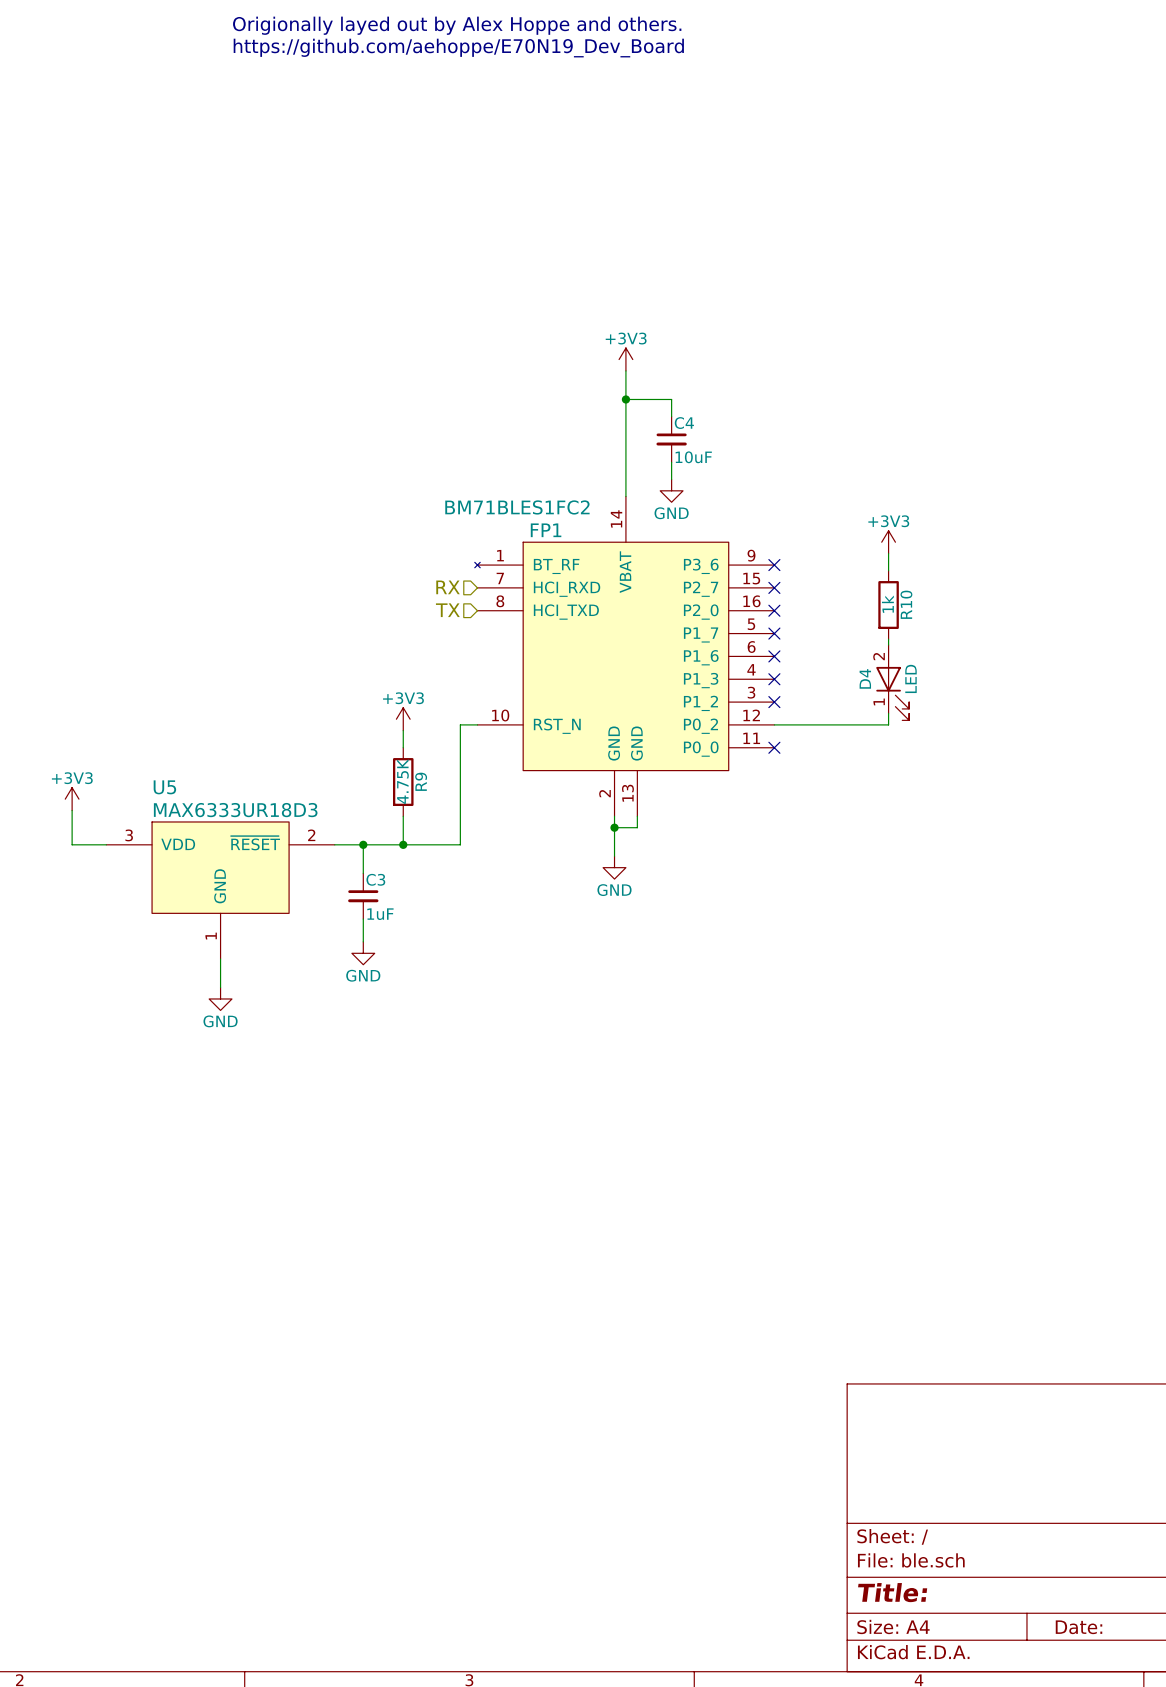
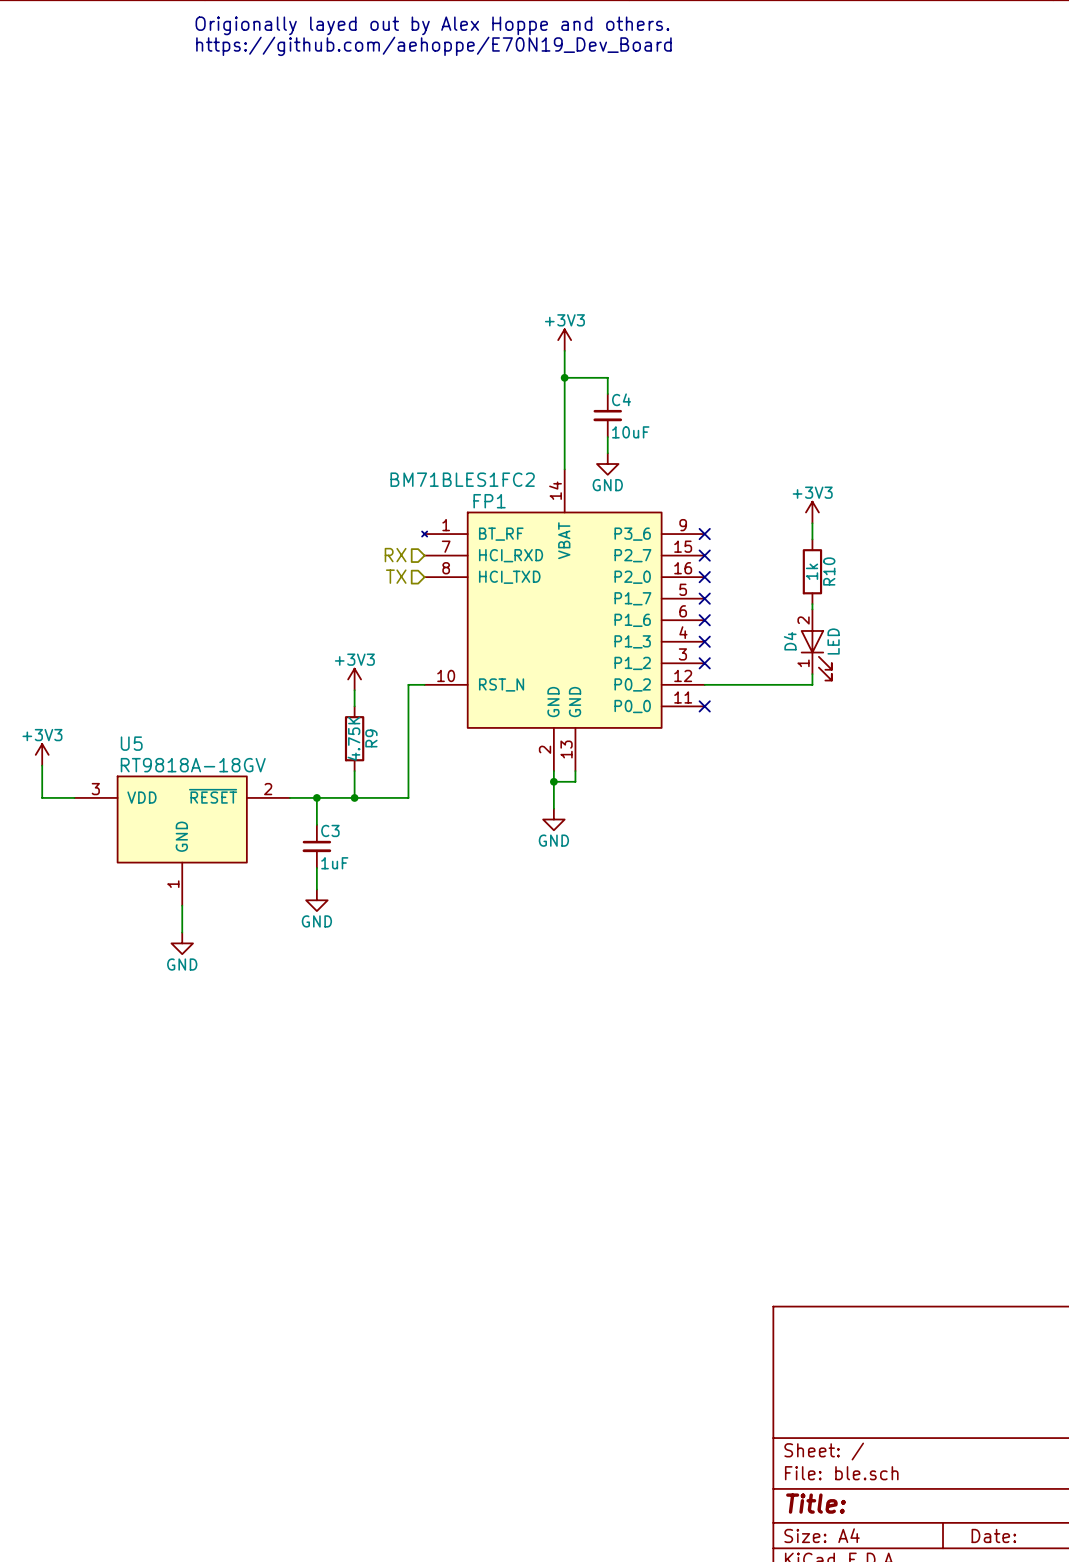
U5 value: MAX6333UR18D3 (235, 810) -> RT9818A-18GV (193, 765)

